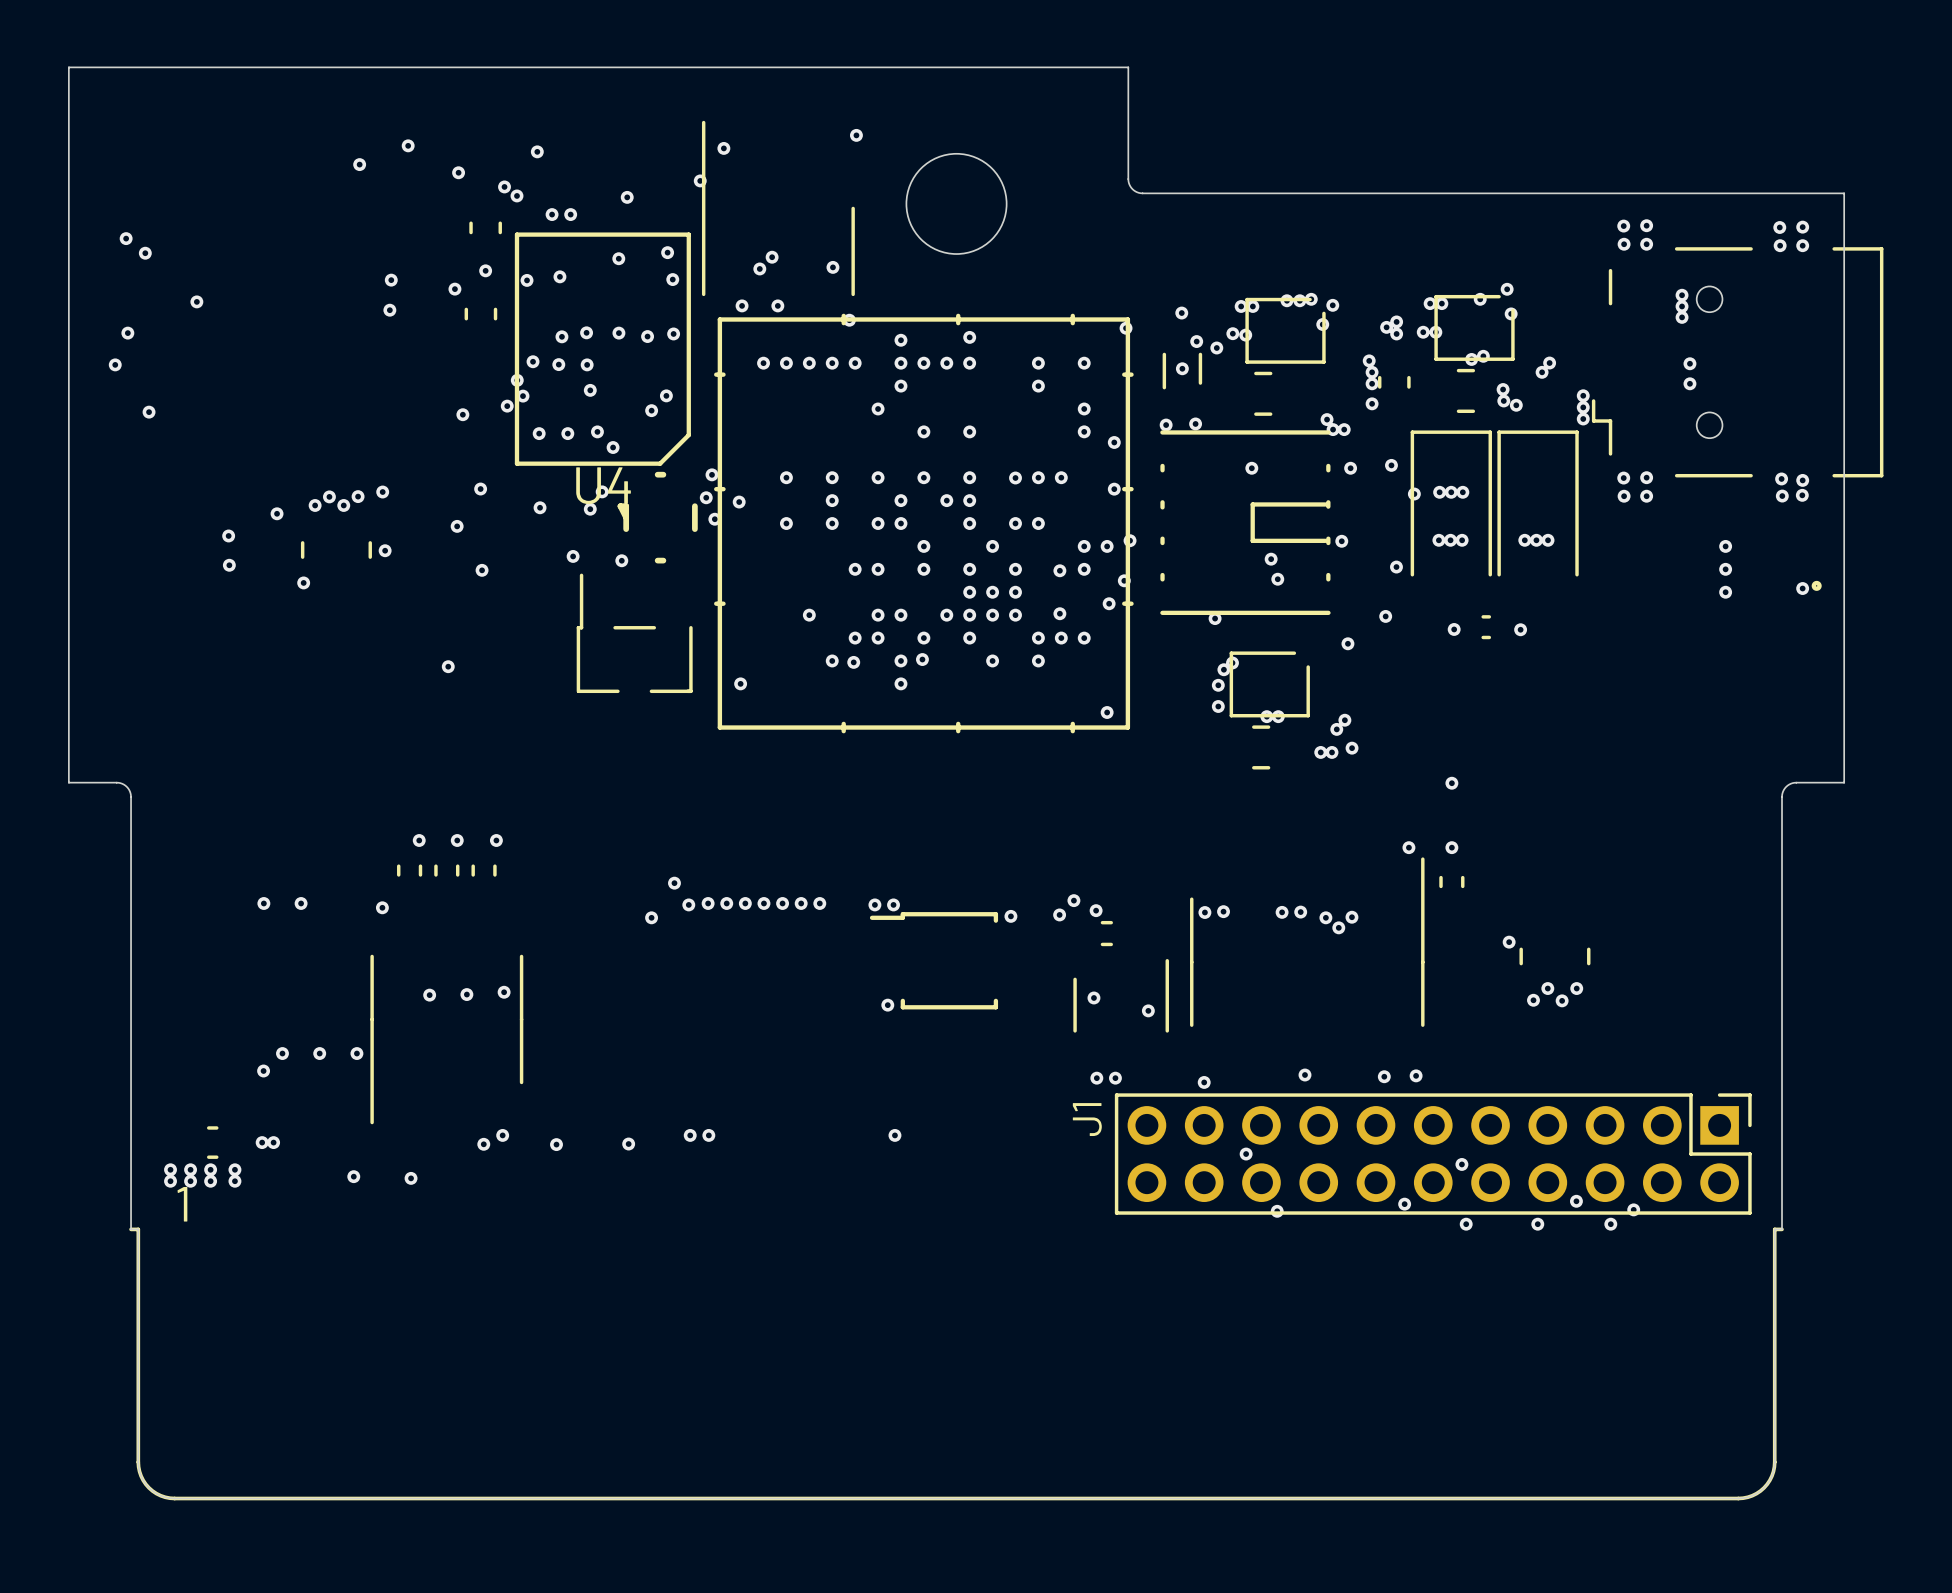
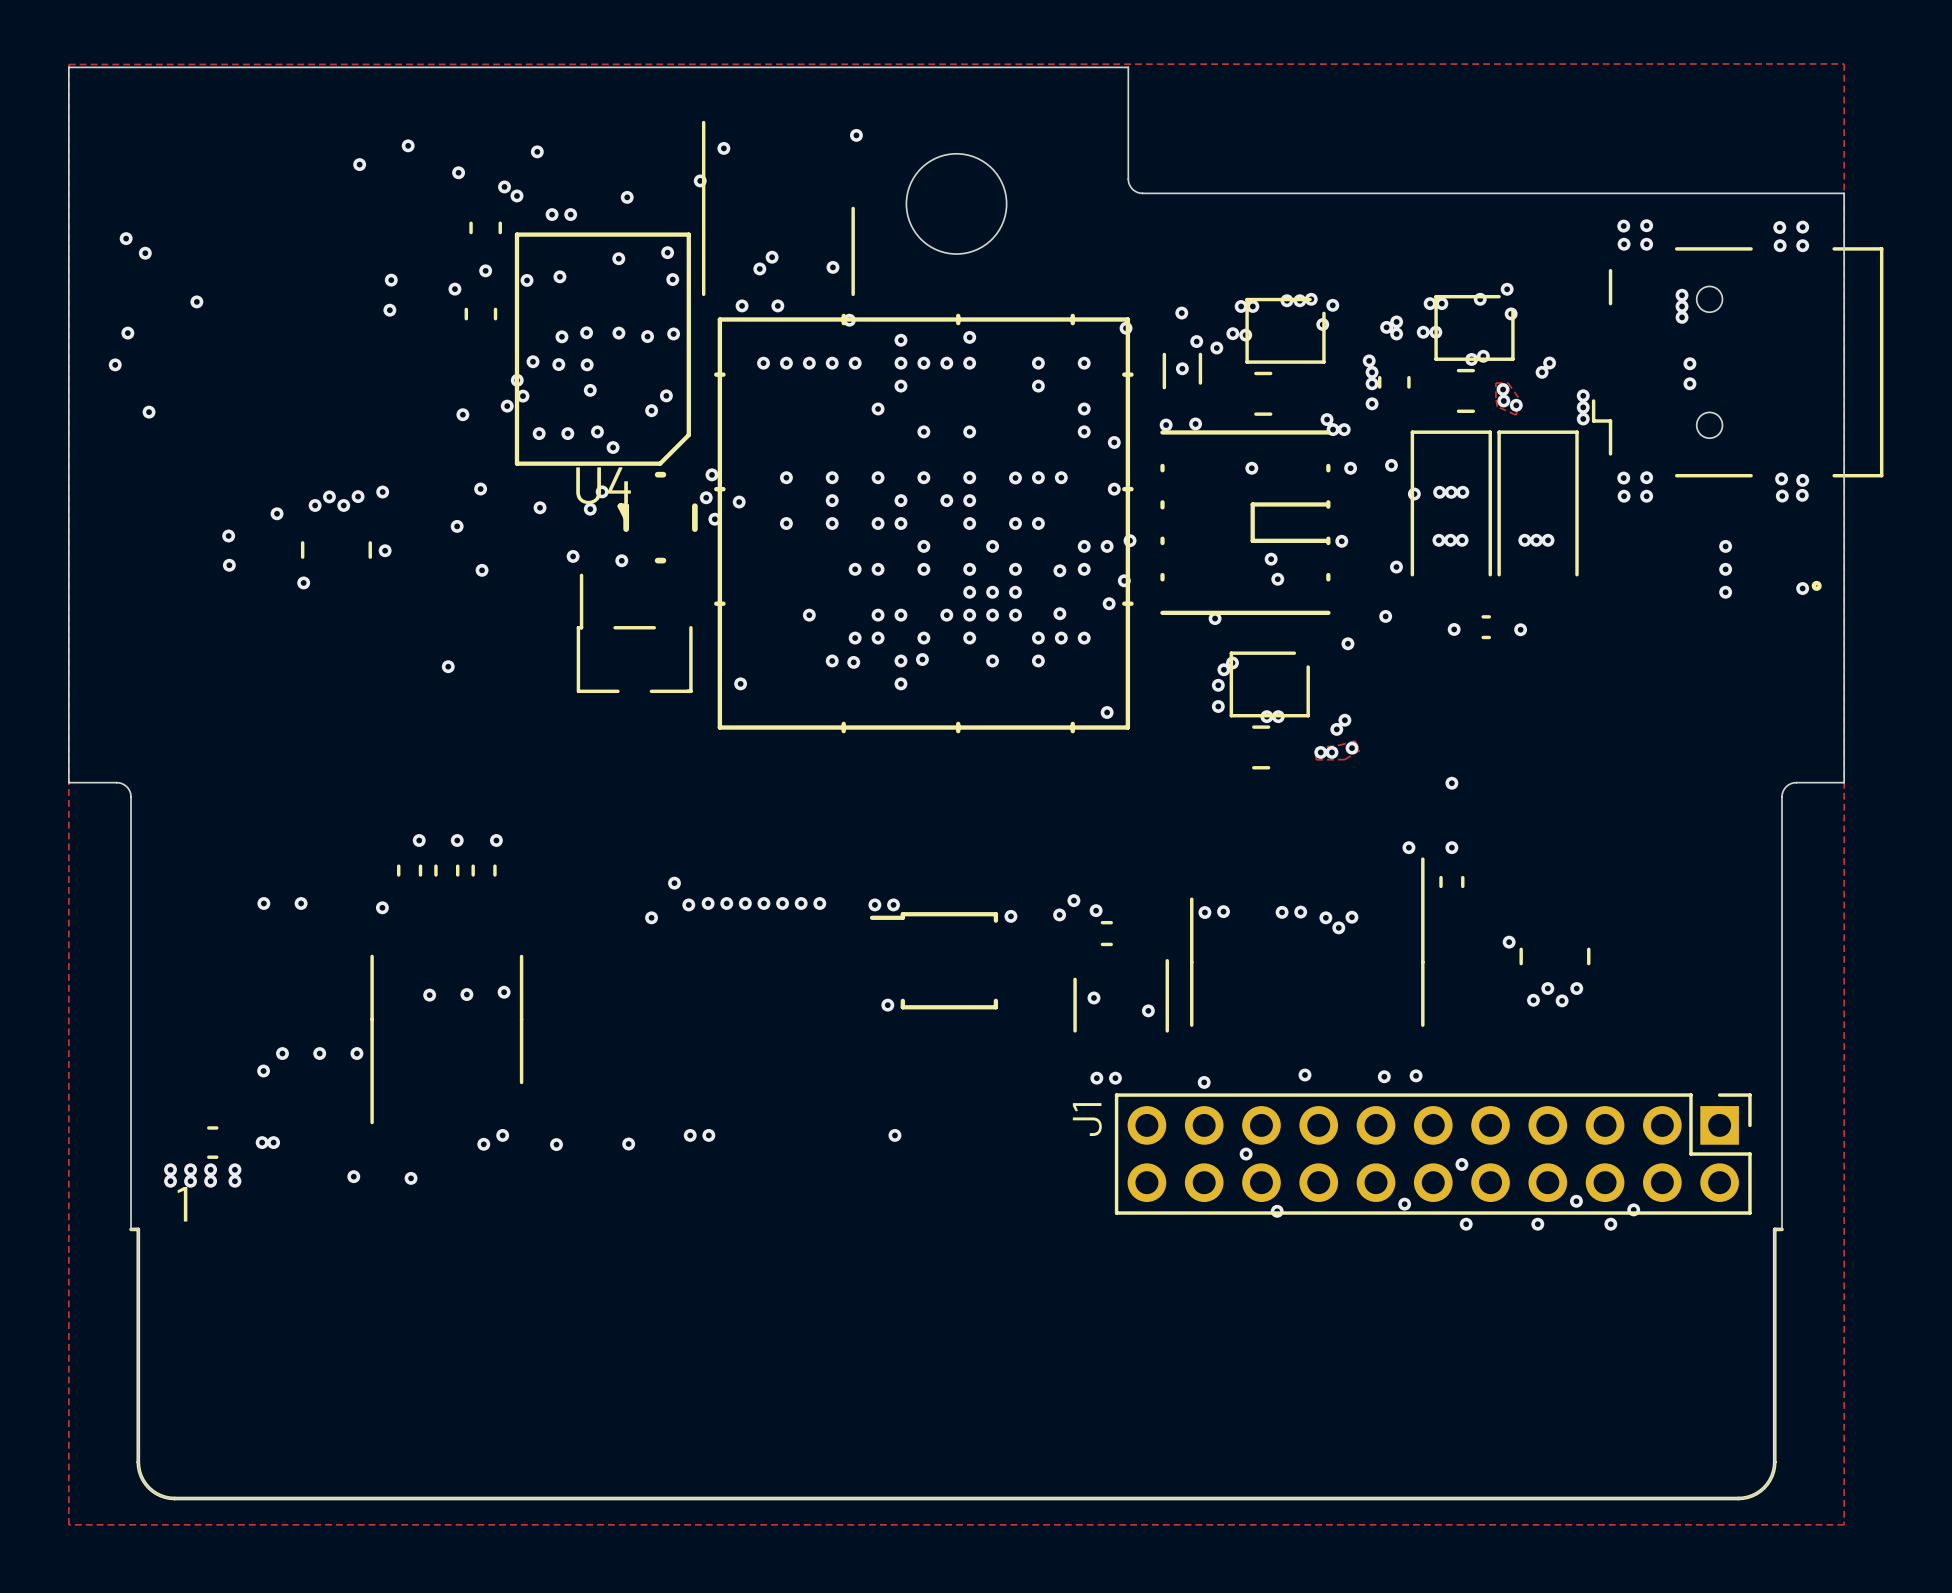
zone outline: none -> (1844, 63) (68, 64) (68, 1524) (1844, 1524) (1844, 63)
zone outline: none -> (1495, 383) (1497, 406) (1515, 415) (1520, 400) (1508, 383) (1495, 383)
zone outline: none -> (1354, 740) (1316, 748) (1316, 759) (1344, 759) (1359, 750) (1354, 740)

